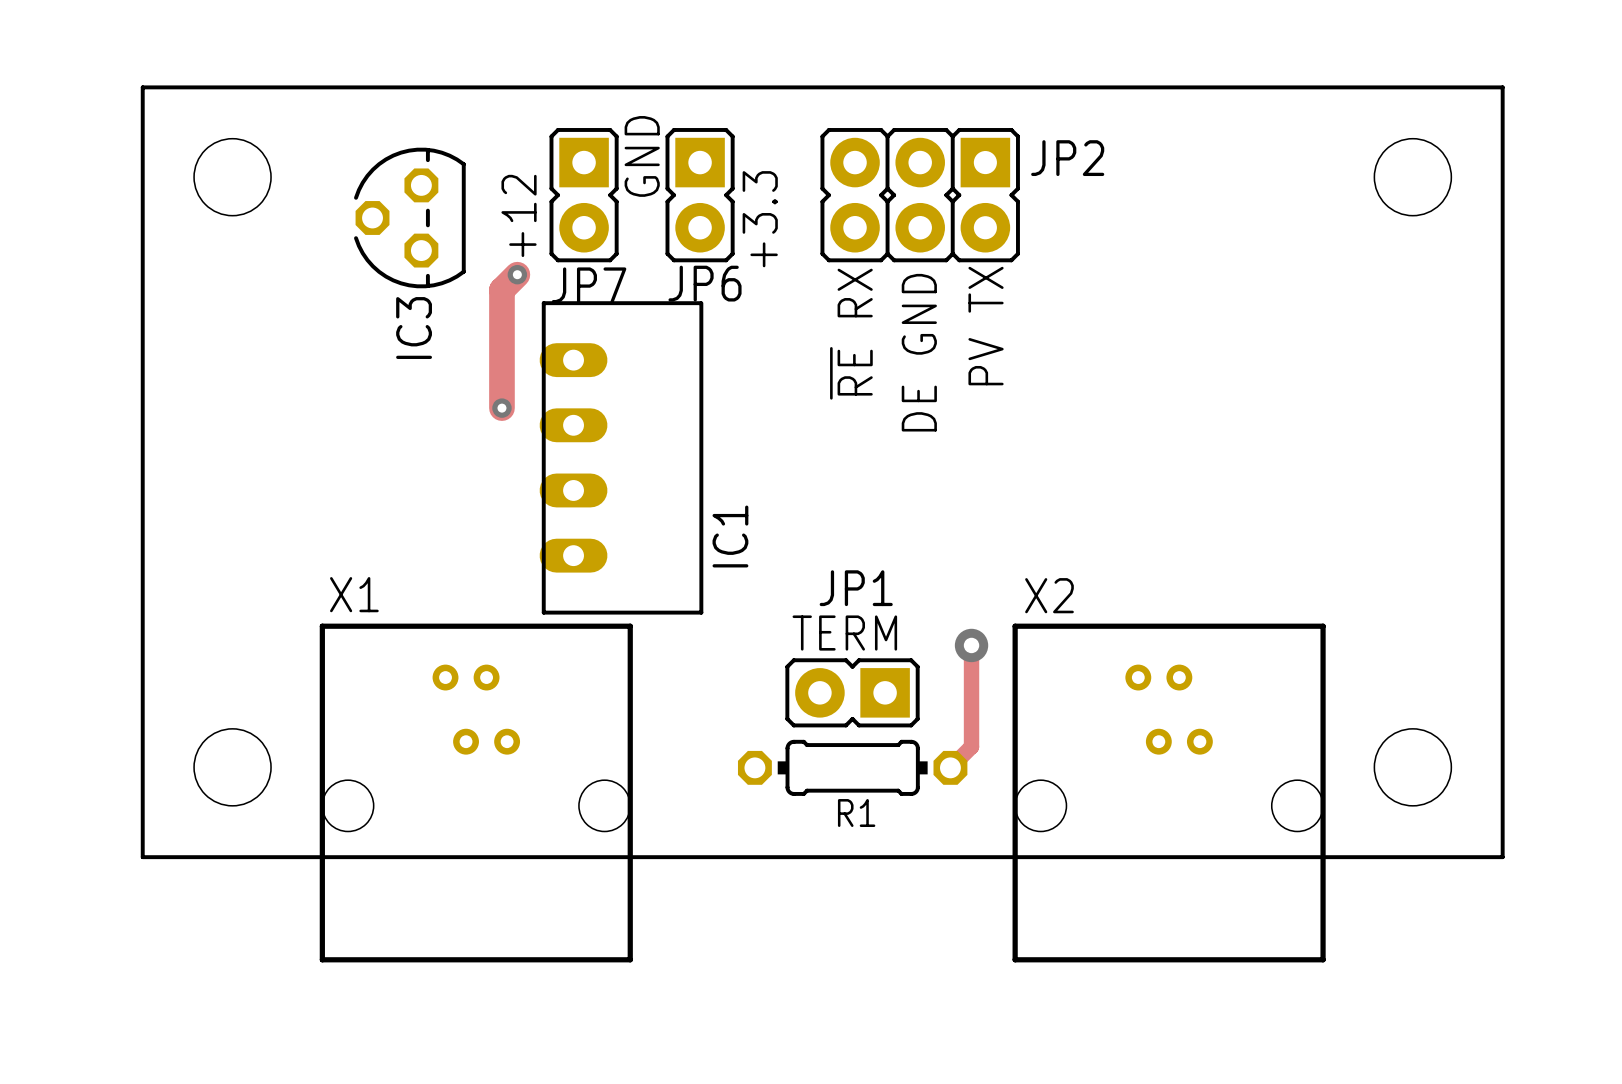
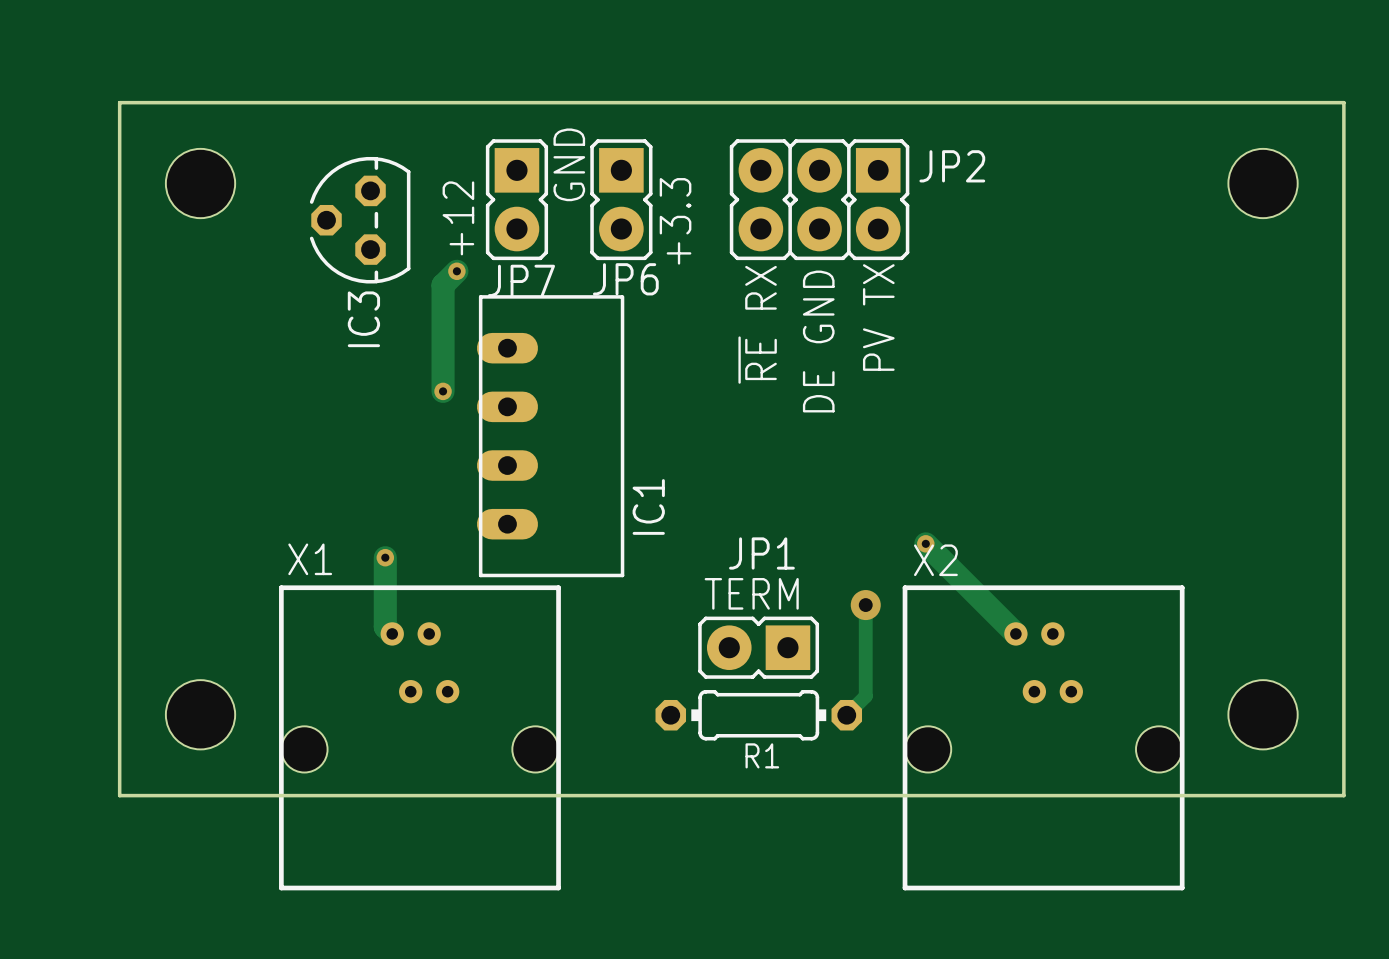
track: none -> (925, 543) (1015, 633)
via: none -> (925, 543)
track: none -> (385, 557) (385, 626) (392, 633)
via: none -> (385, 557)

